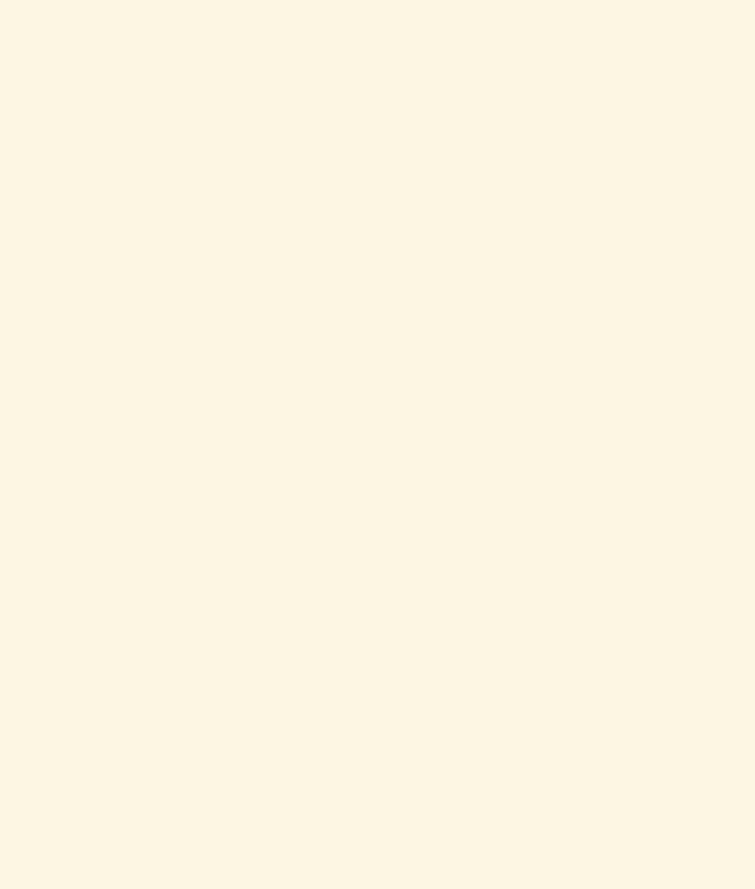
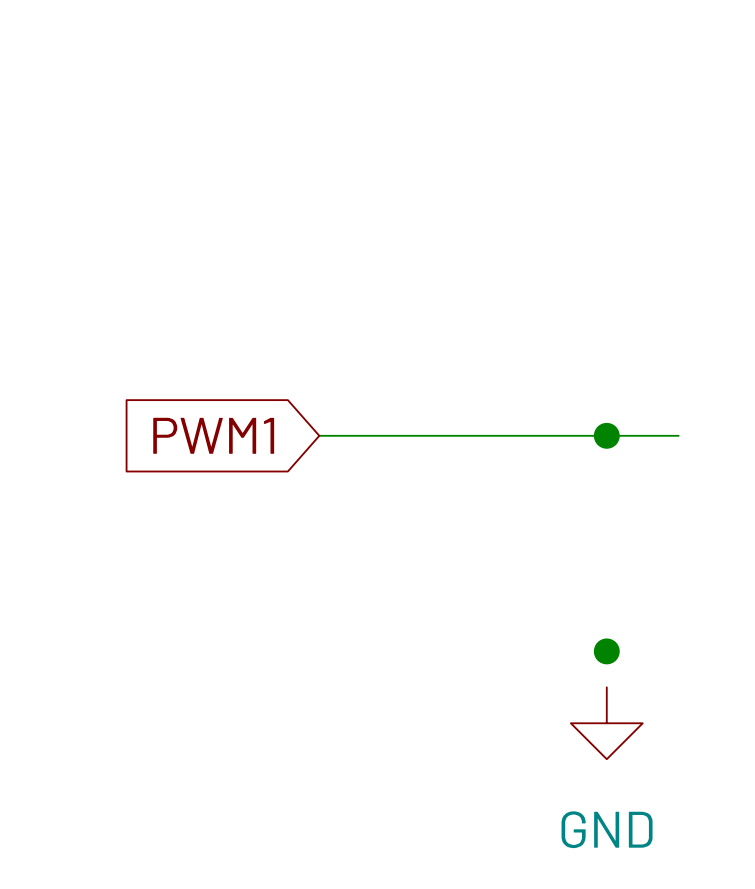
global label: none -> PWM1 (213, 435)
wire: none -> (319, 435) (678, 435)
junction: none -> (606, 435)
junction: none -> (606, 651)
power symbol: none -> GND (606, 723)

